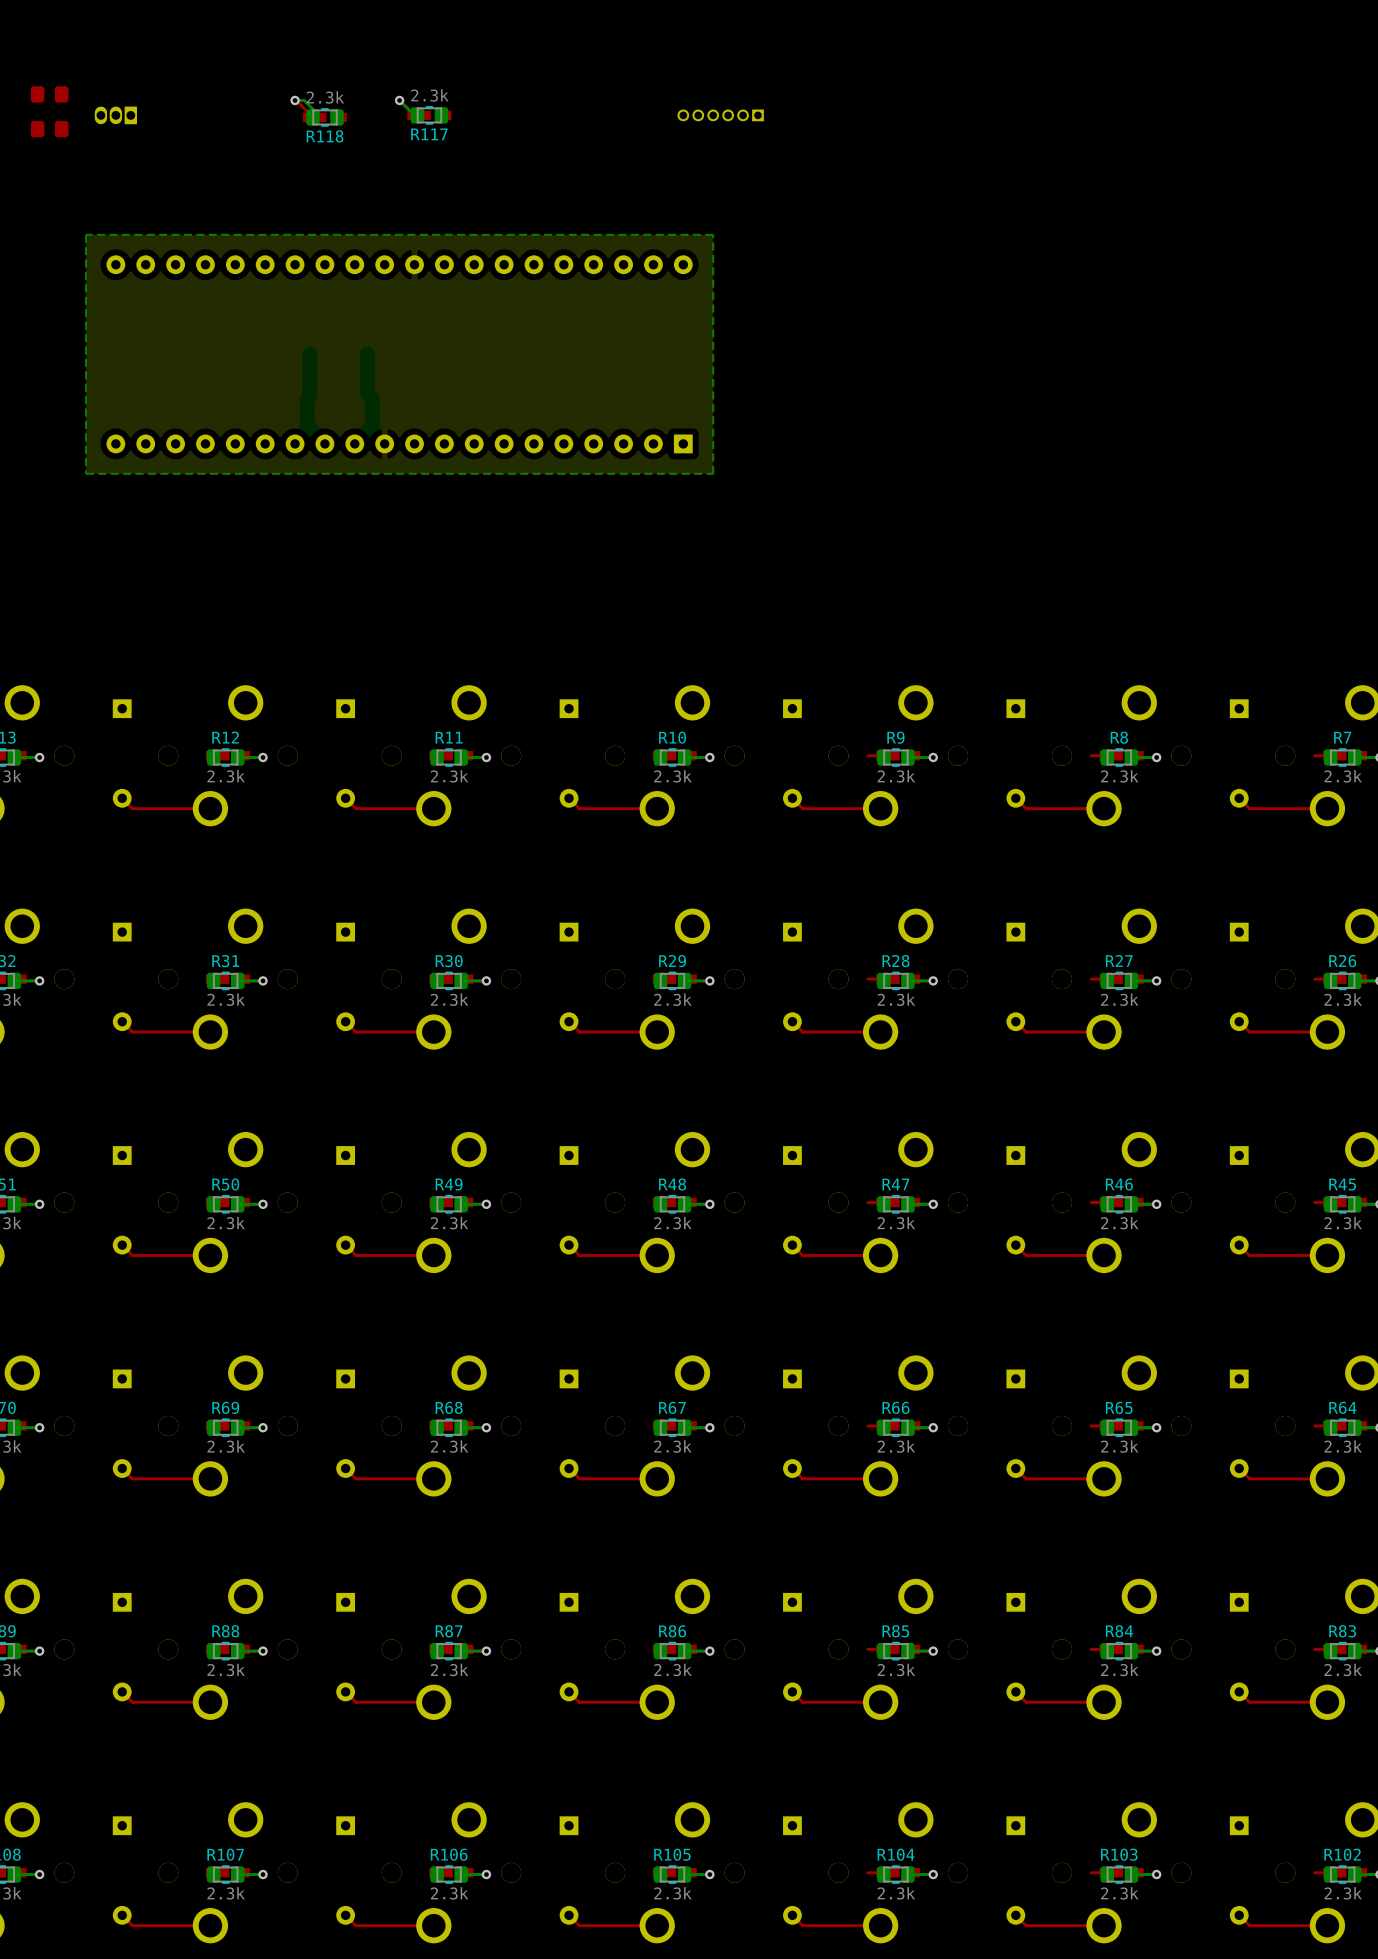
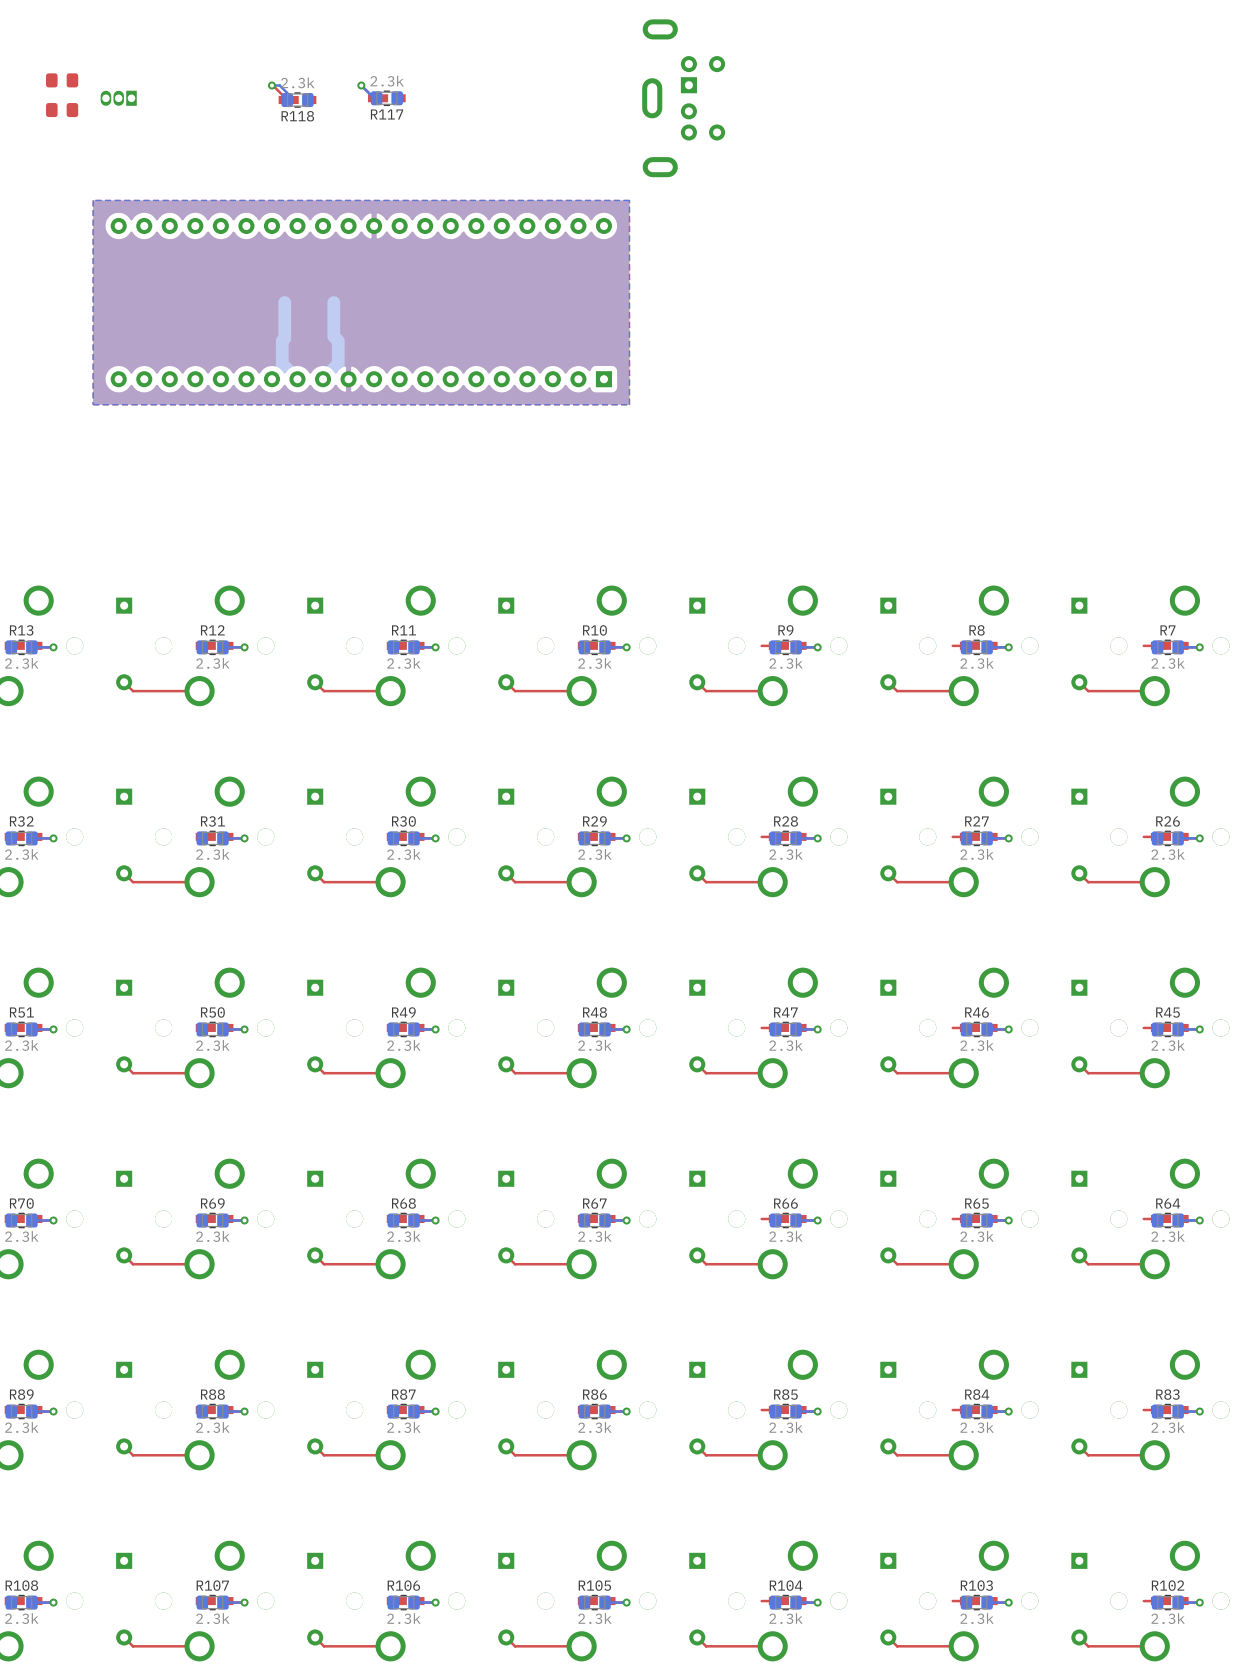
part: (720, 115) -> none
part: none -> (683, 98)

